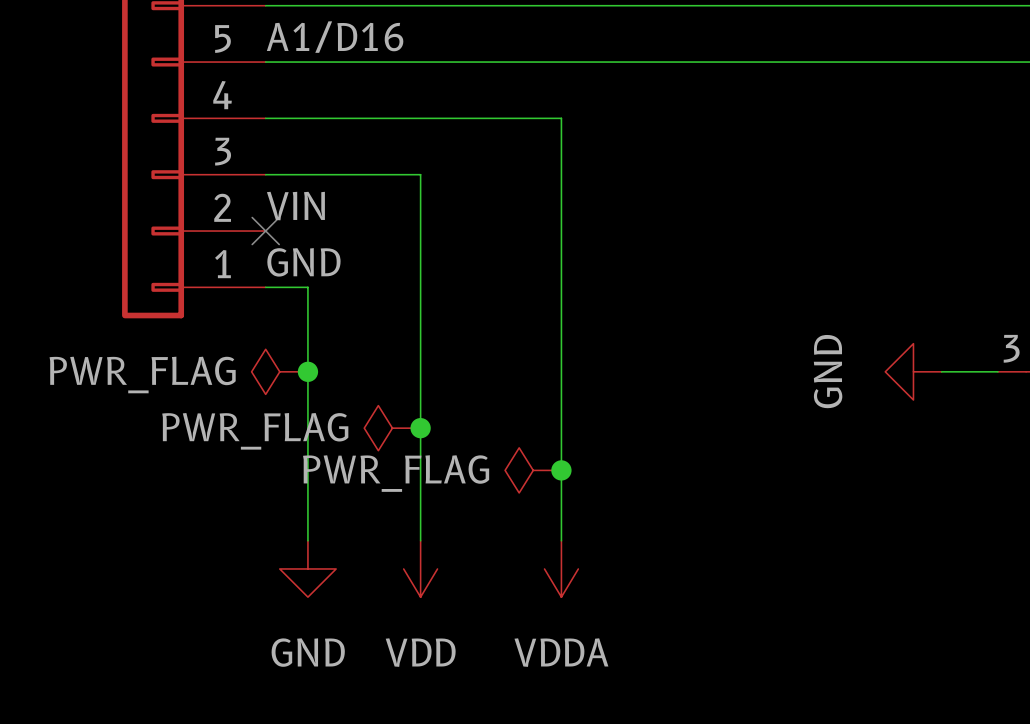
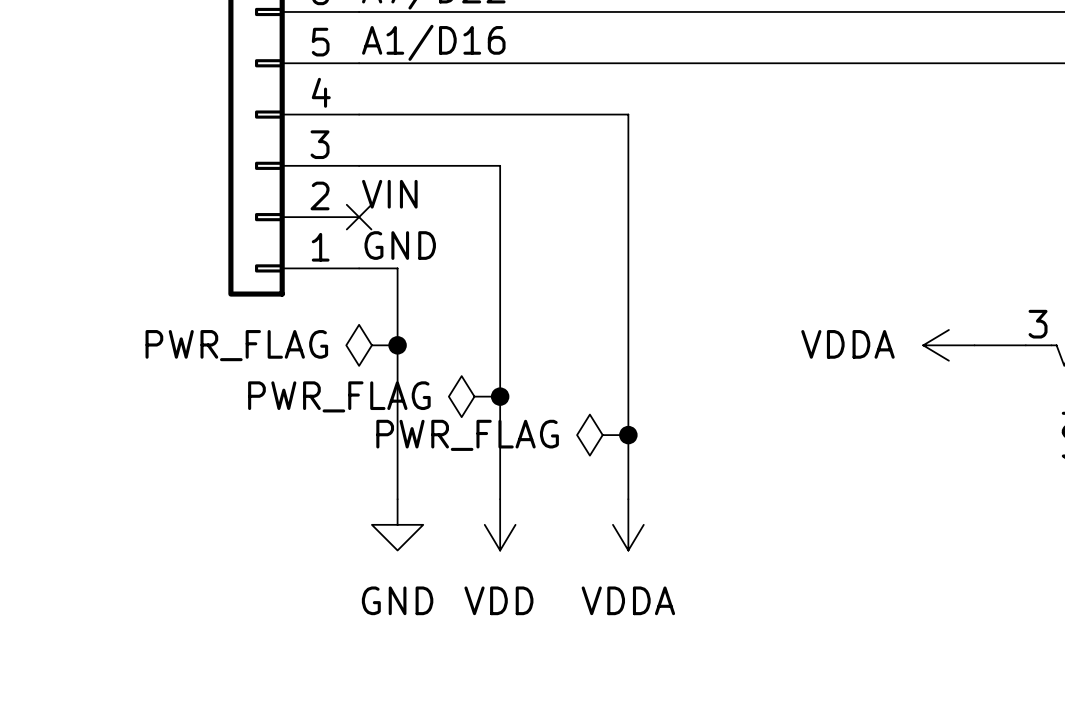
power symbol: GND (913, 371) -> VDDA (948, 345)

